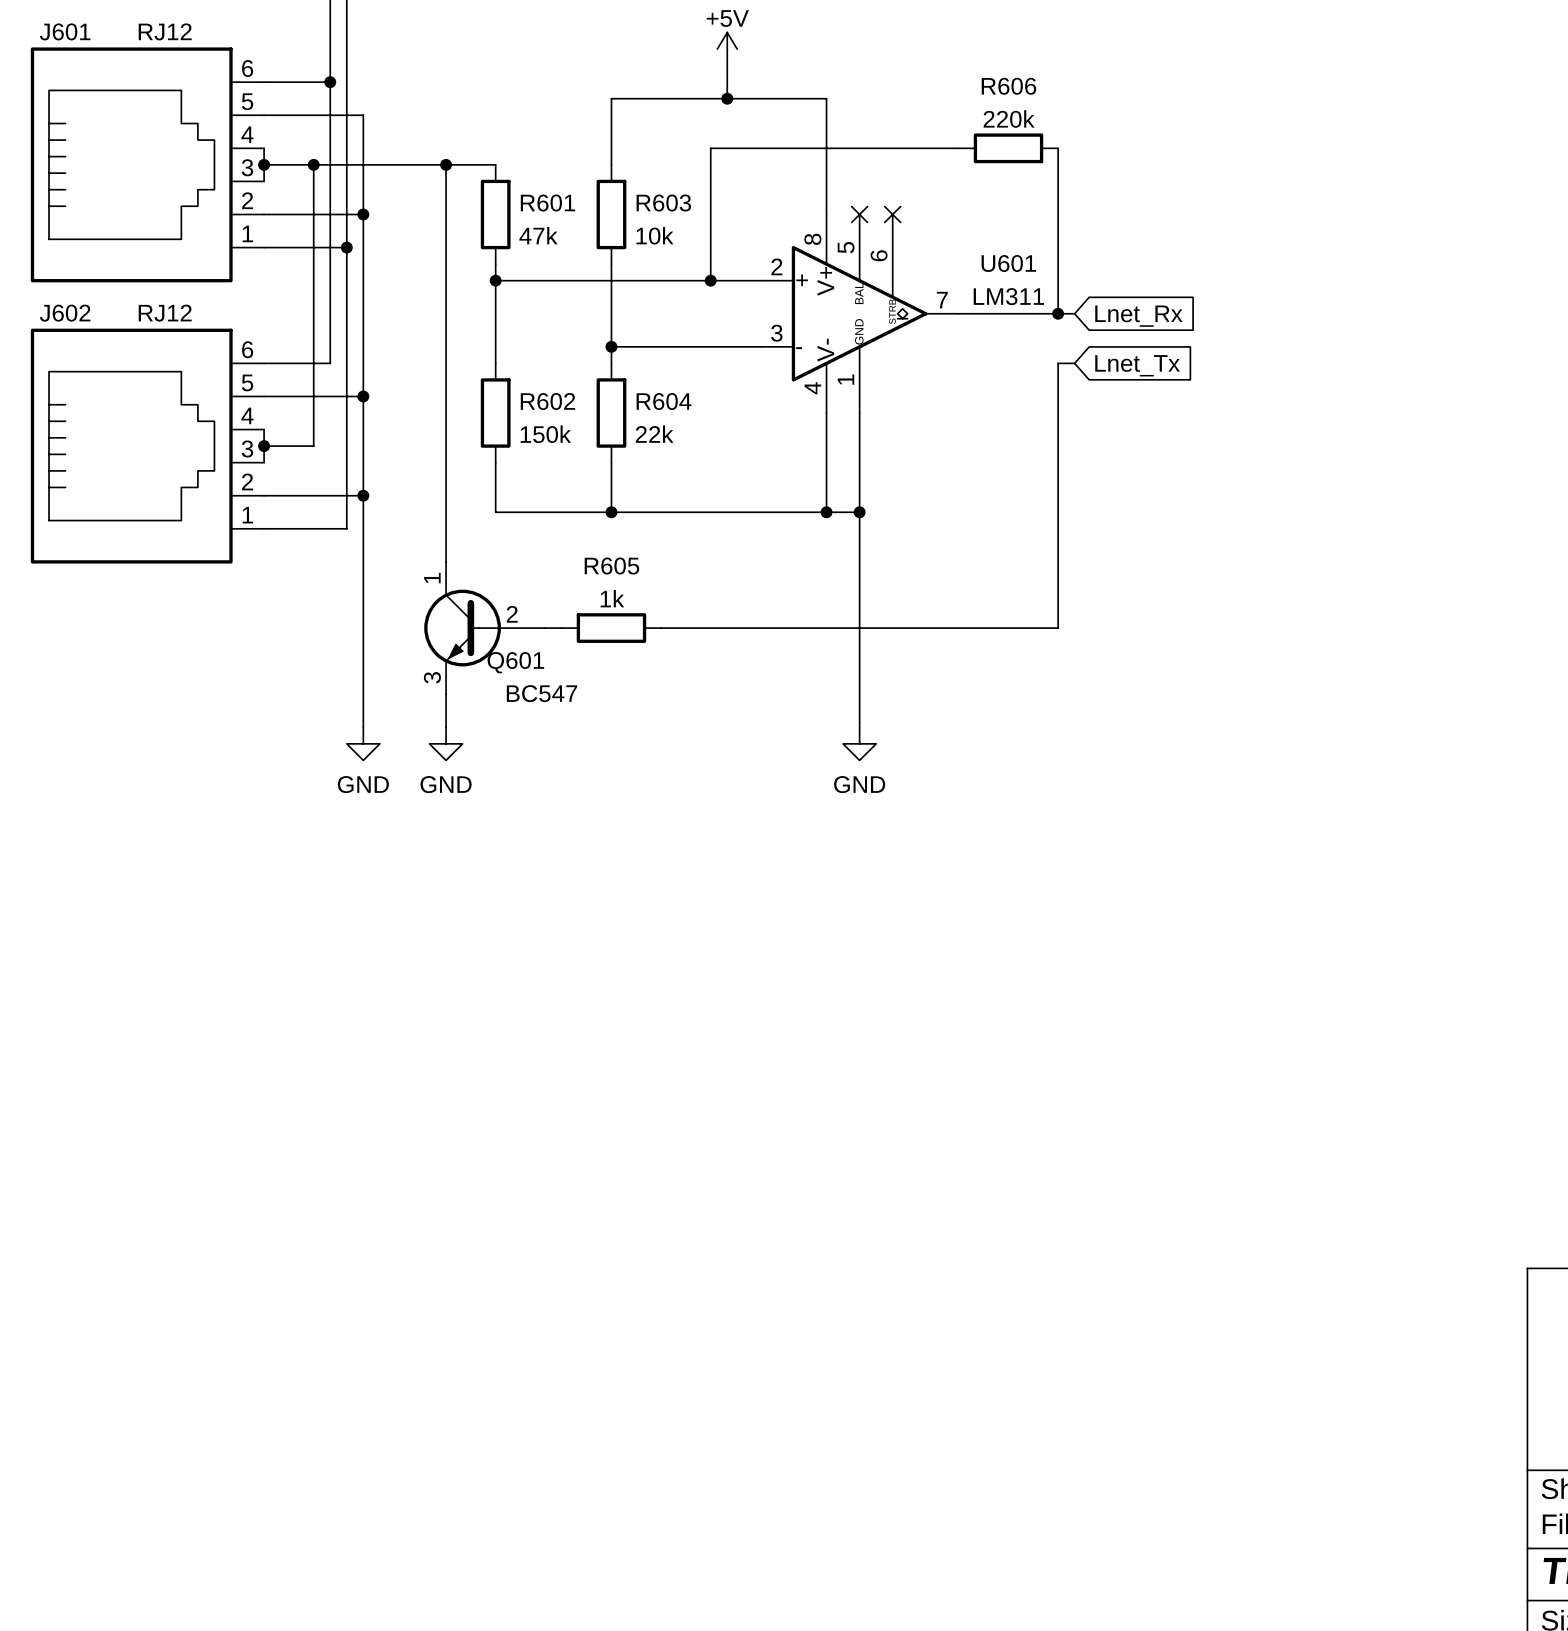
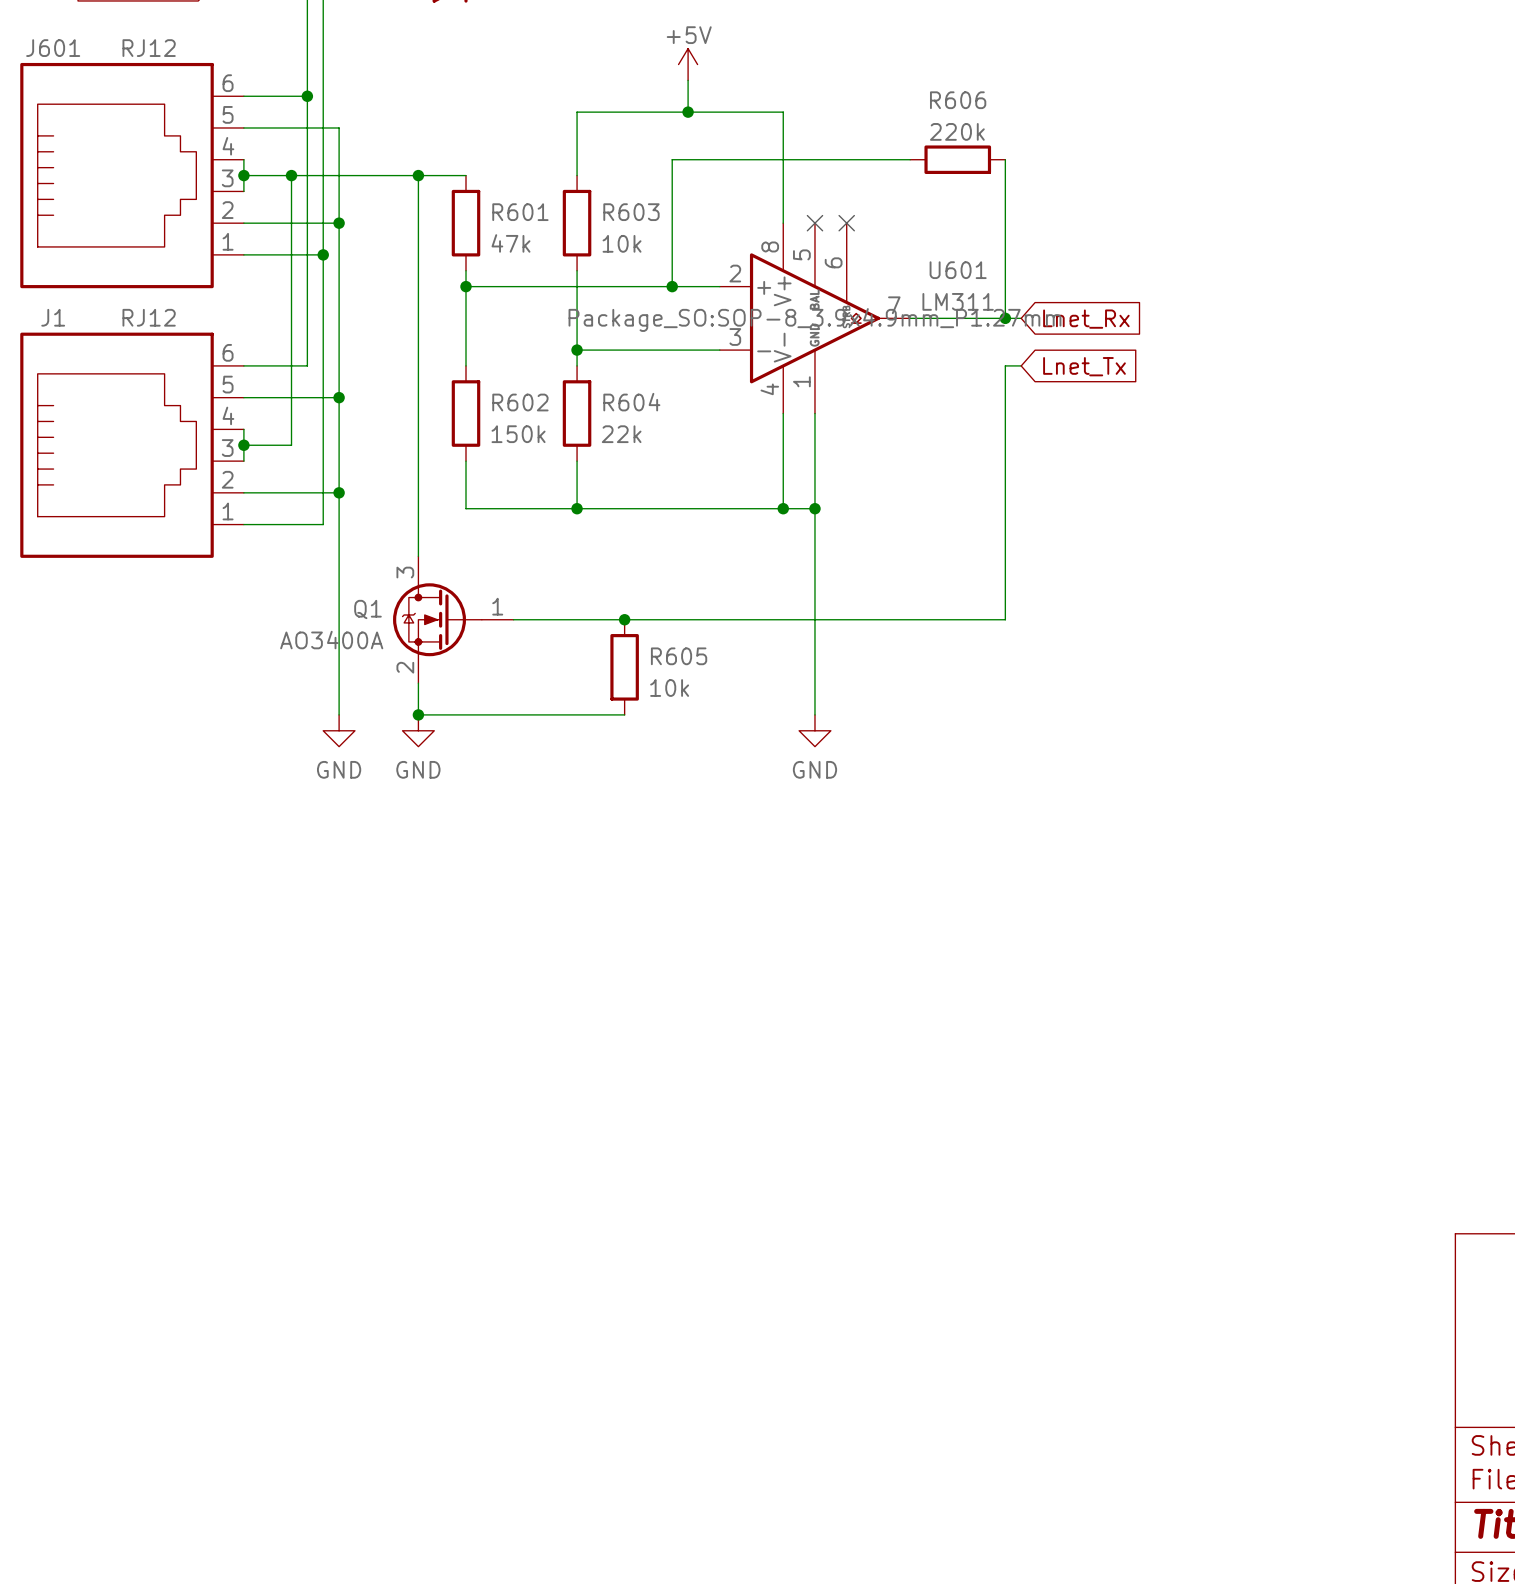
J602 name: J602 (65, 313) -> J1 (53, 317)
U601 text: none -> Package_SO:SOP-8_3.9x4.9mm_P1.27mm (814, 320)
R605 value: 1k (612, 598) -> 10k (669, 688)
Q1: none -> AO3400A (453, 619)
Q601: BC547 (484, 628) -> none
wire: none -> (529, 619) (624, 619)
R605 rotation: 0° (611, 628) -> 90° clockwise (624, 667)
R605 position: (611, 628) -> (624, 667)
junction: none -> (624, 619)
wire: none -> (418, 714) (624, 714)
junction: none -> (418, 714)

